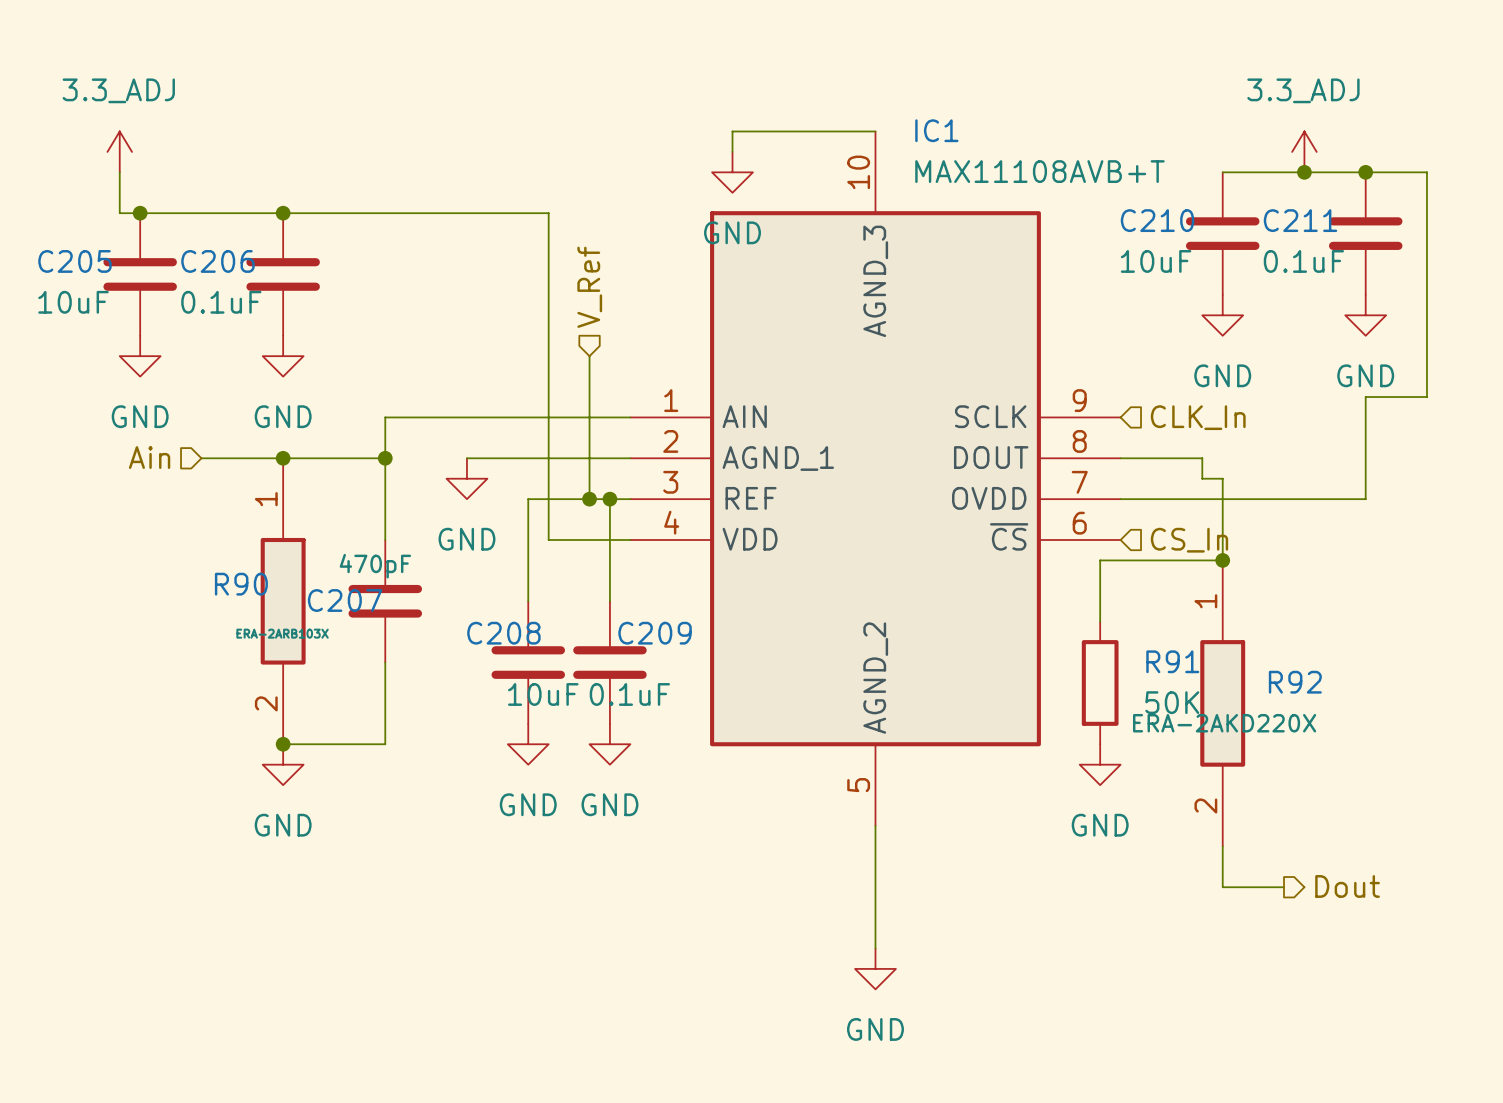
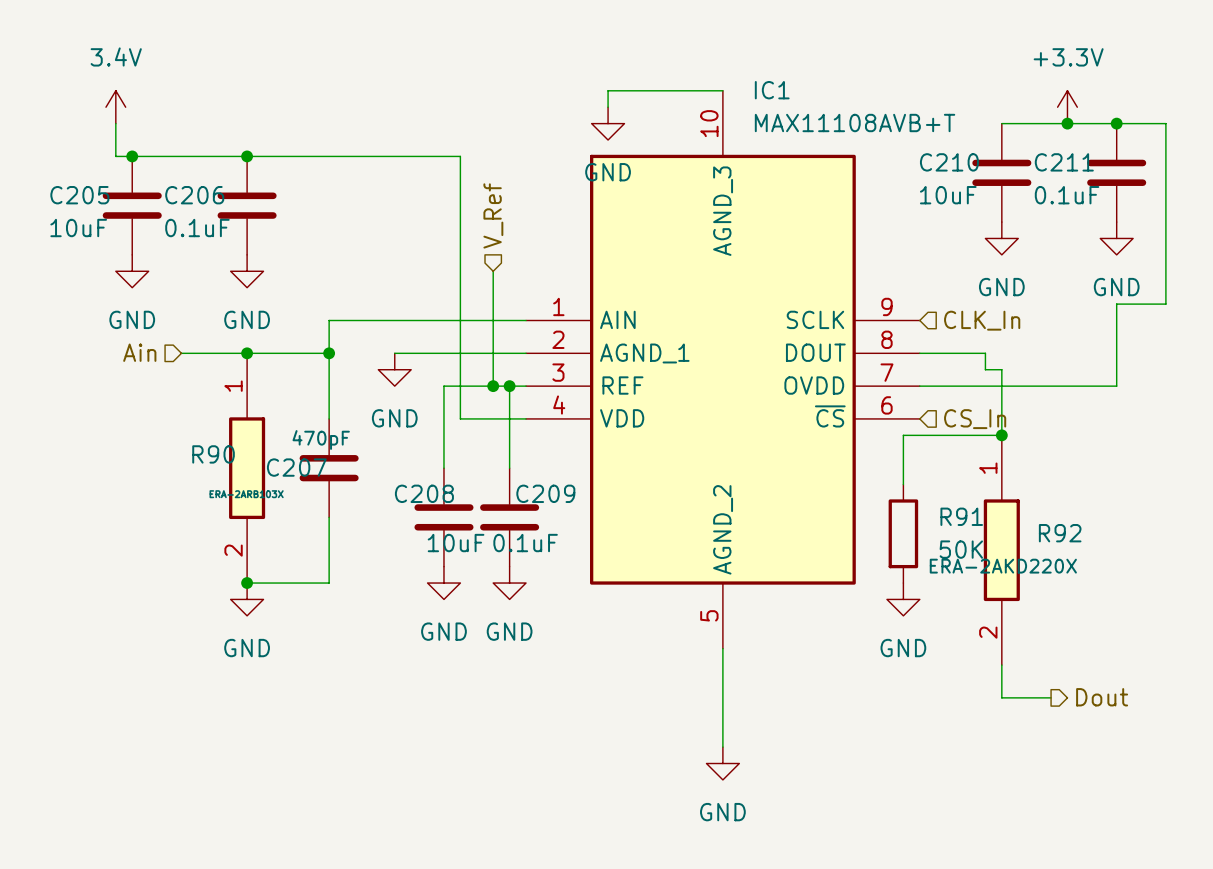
power symbol: 3.3_ADJ (119, 151) -> 3.4V (115, 107)
power symbol: 3.3_ADJ (1304, 151) -> +3.3V (1067, 107)

